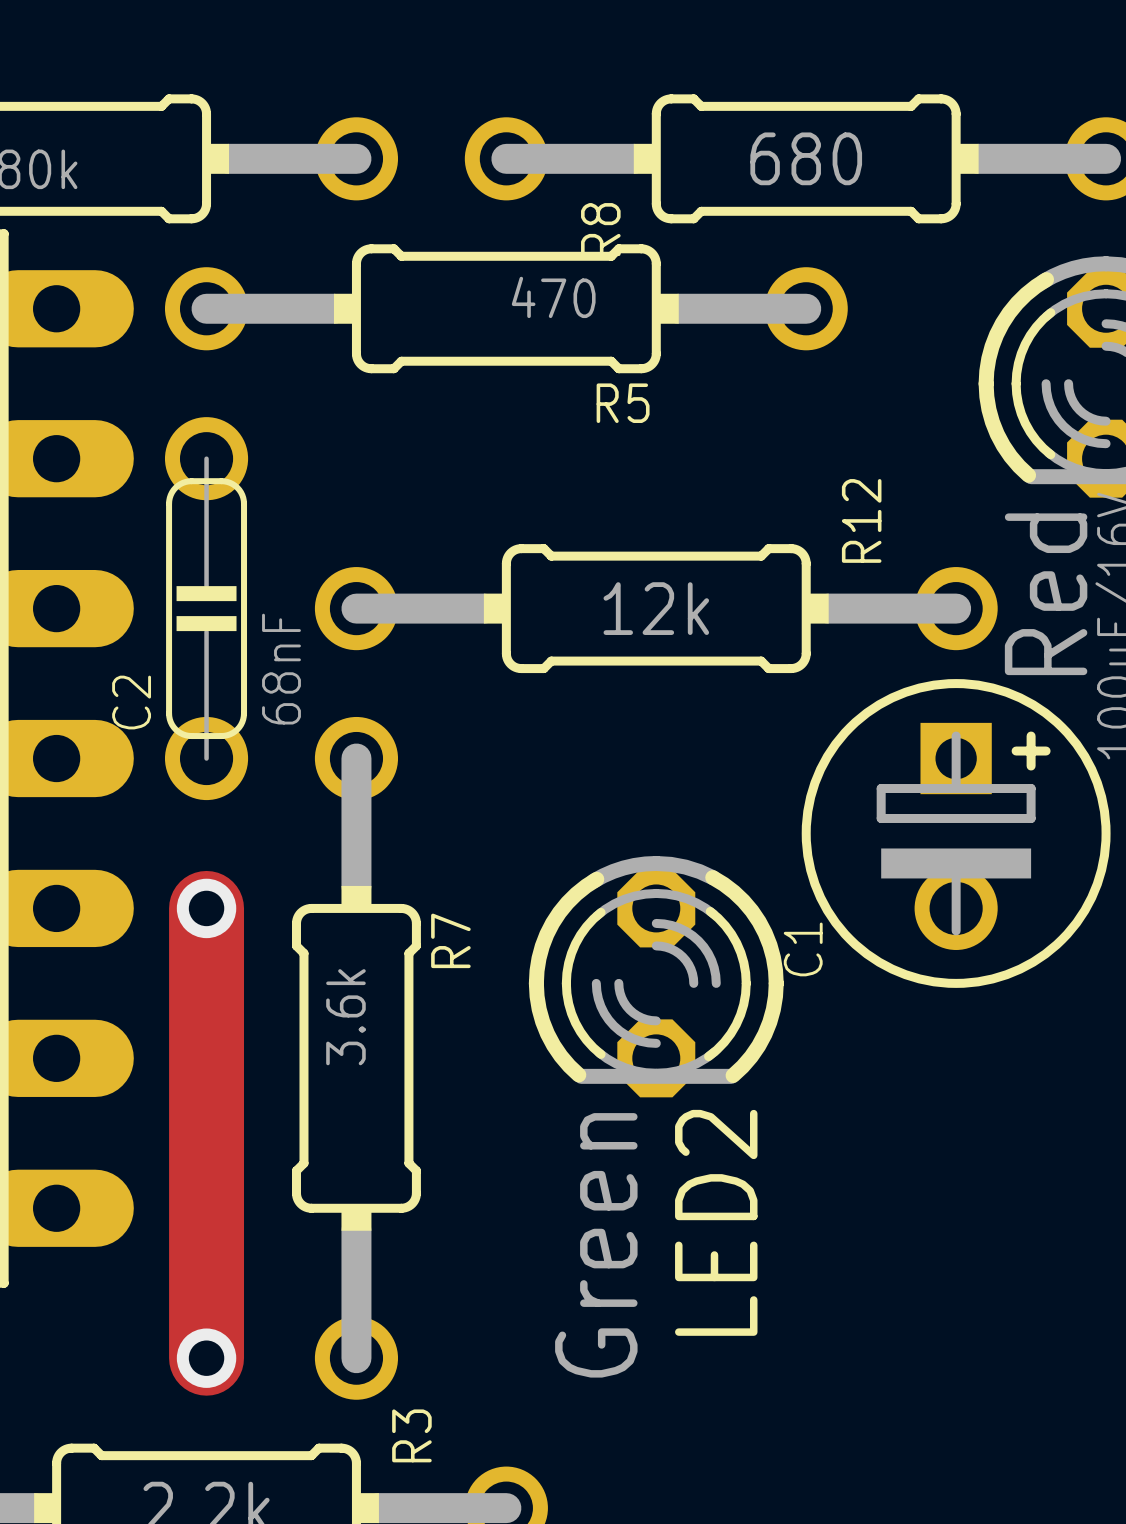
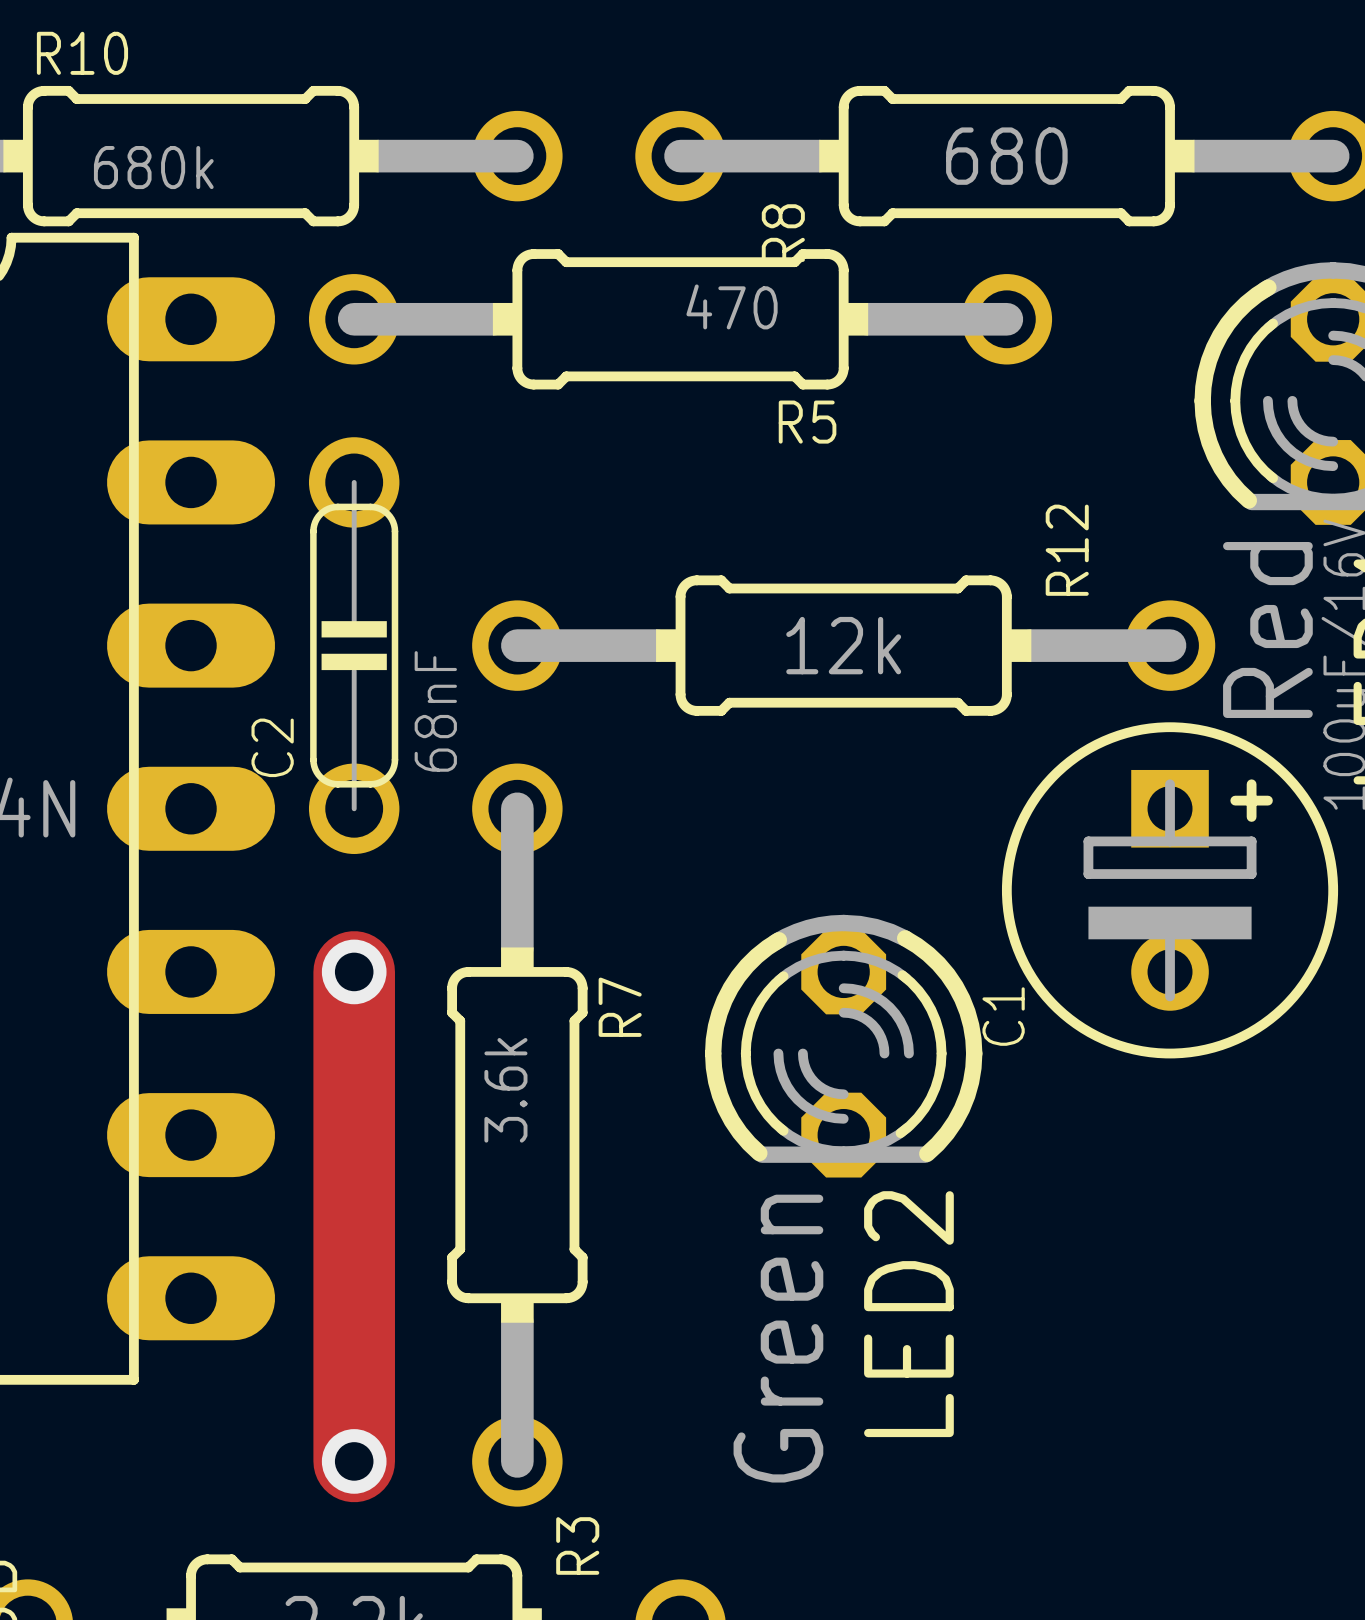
C1 footprint: [801, 679, 1111, 988] -> [1001, 722, 1339, 1059]

